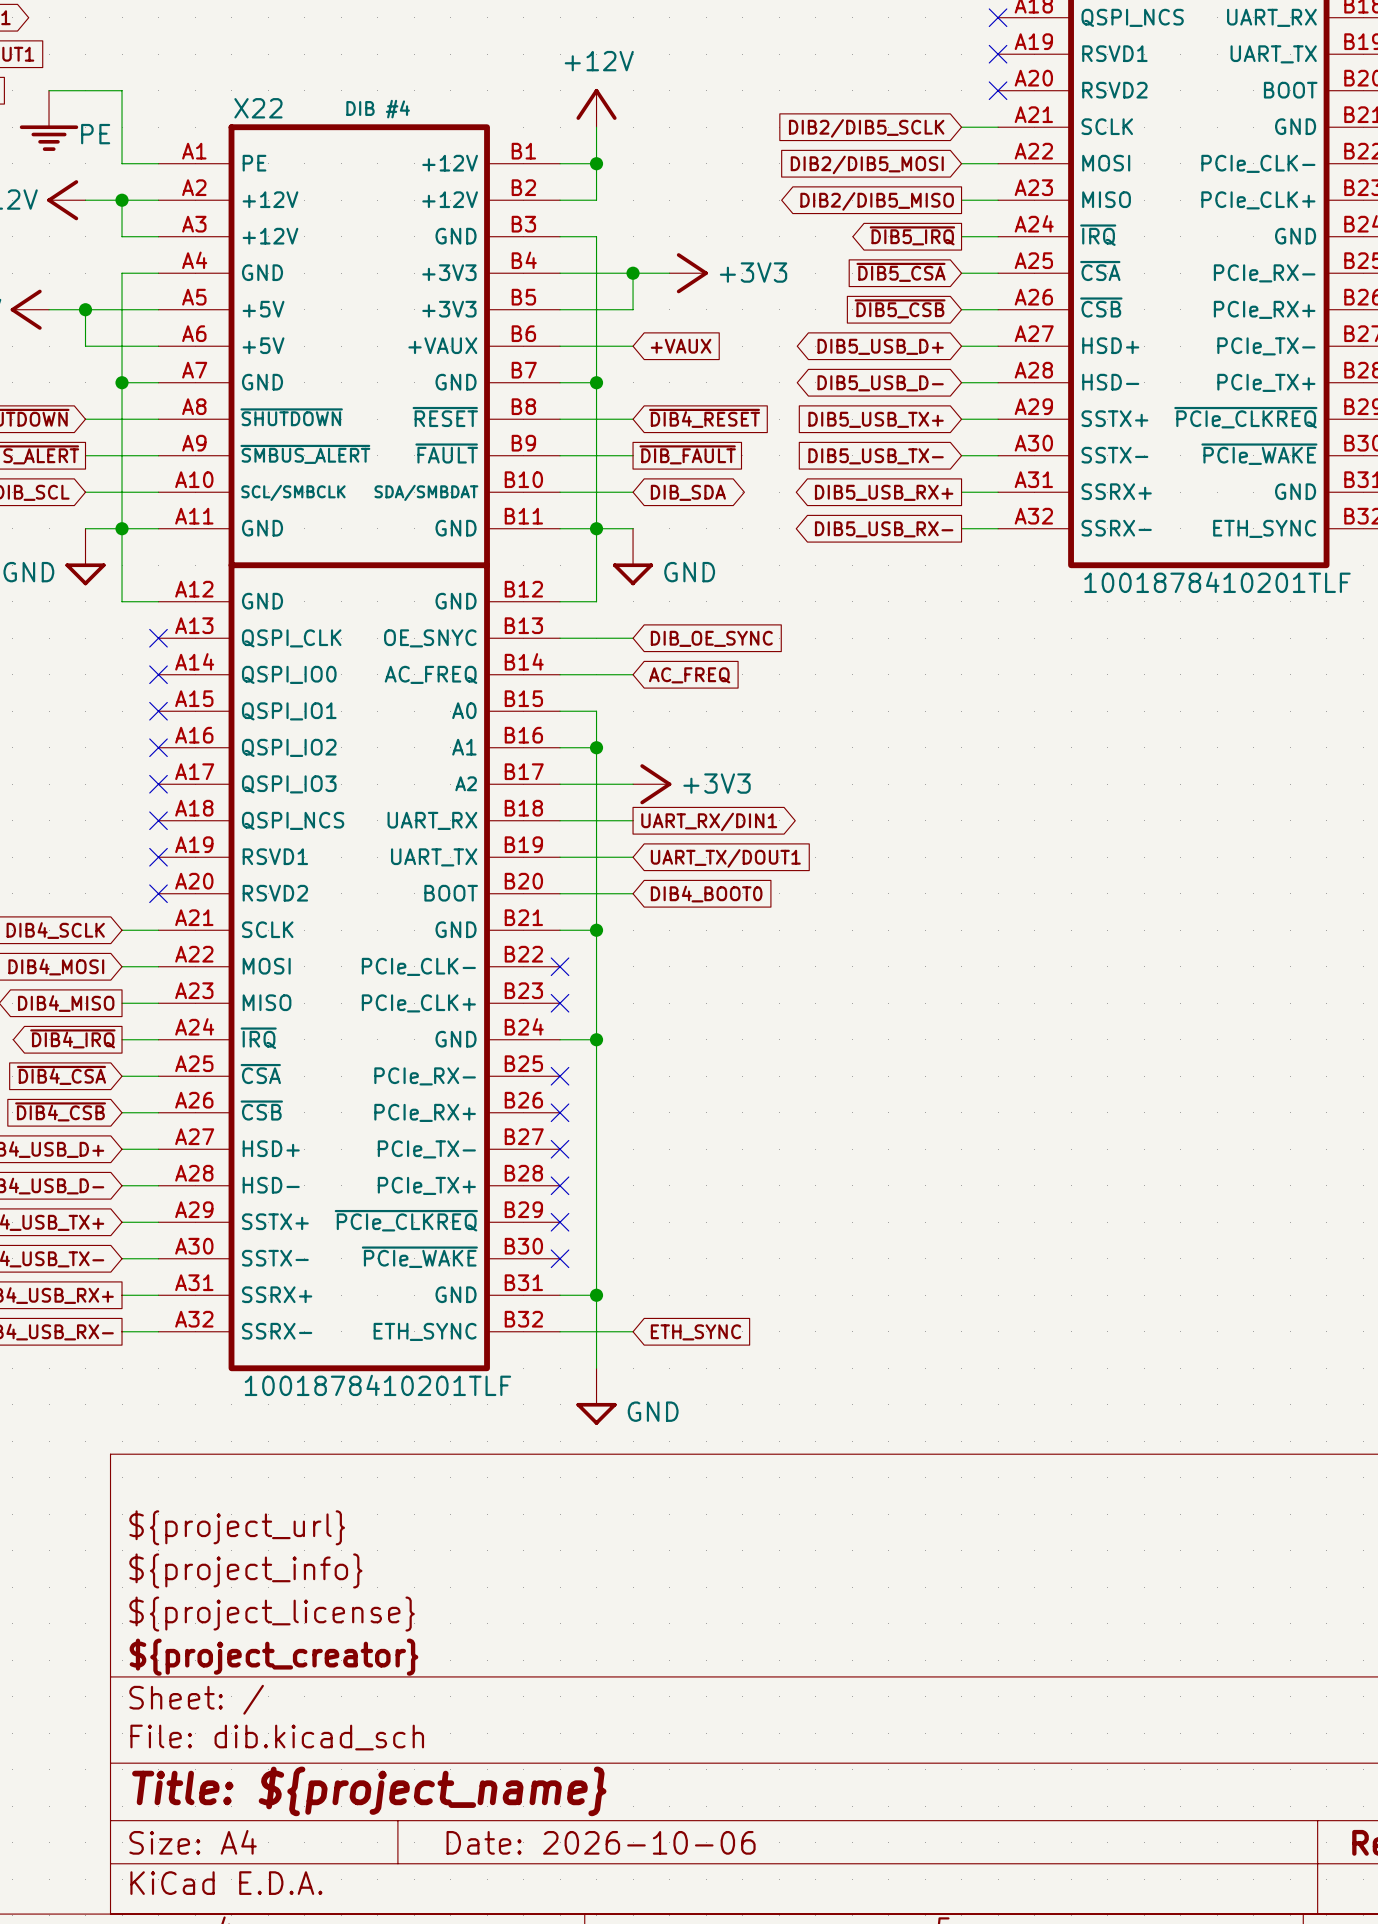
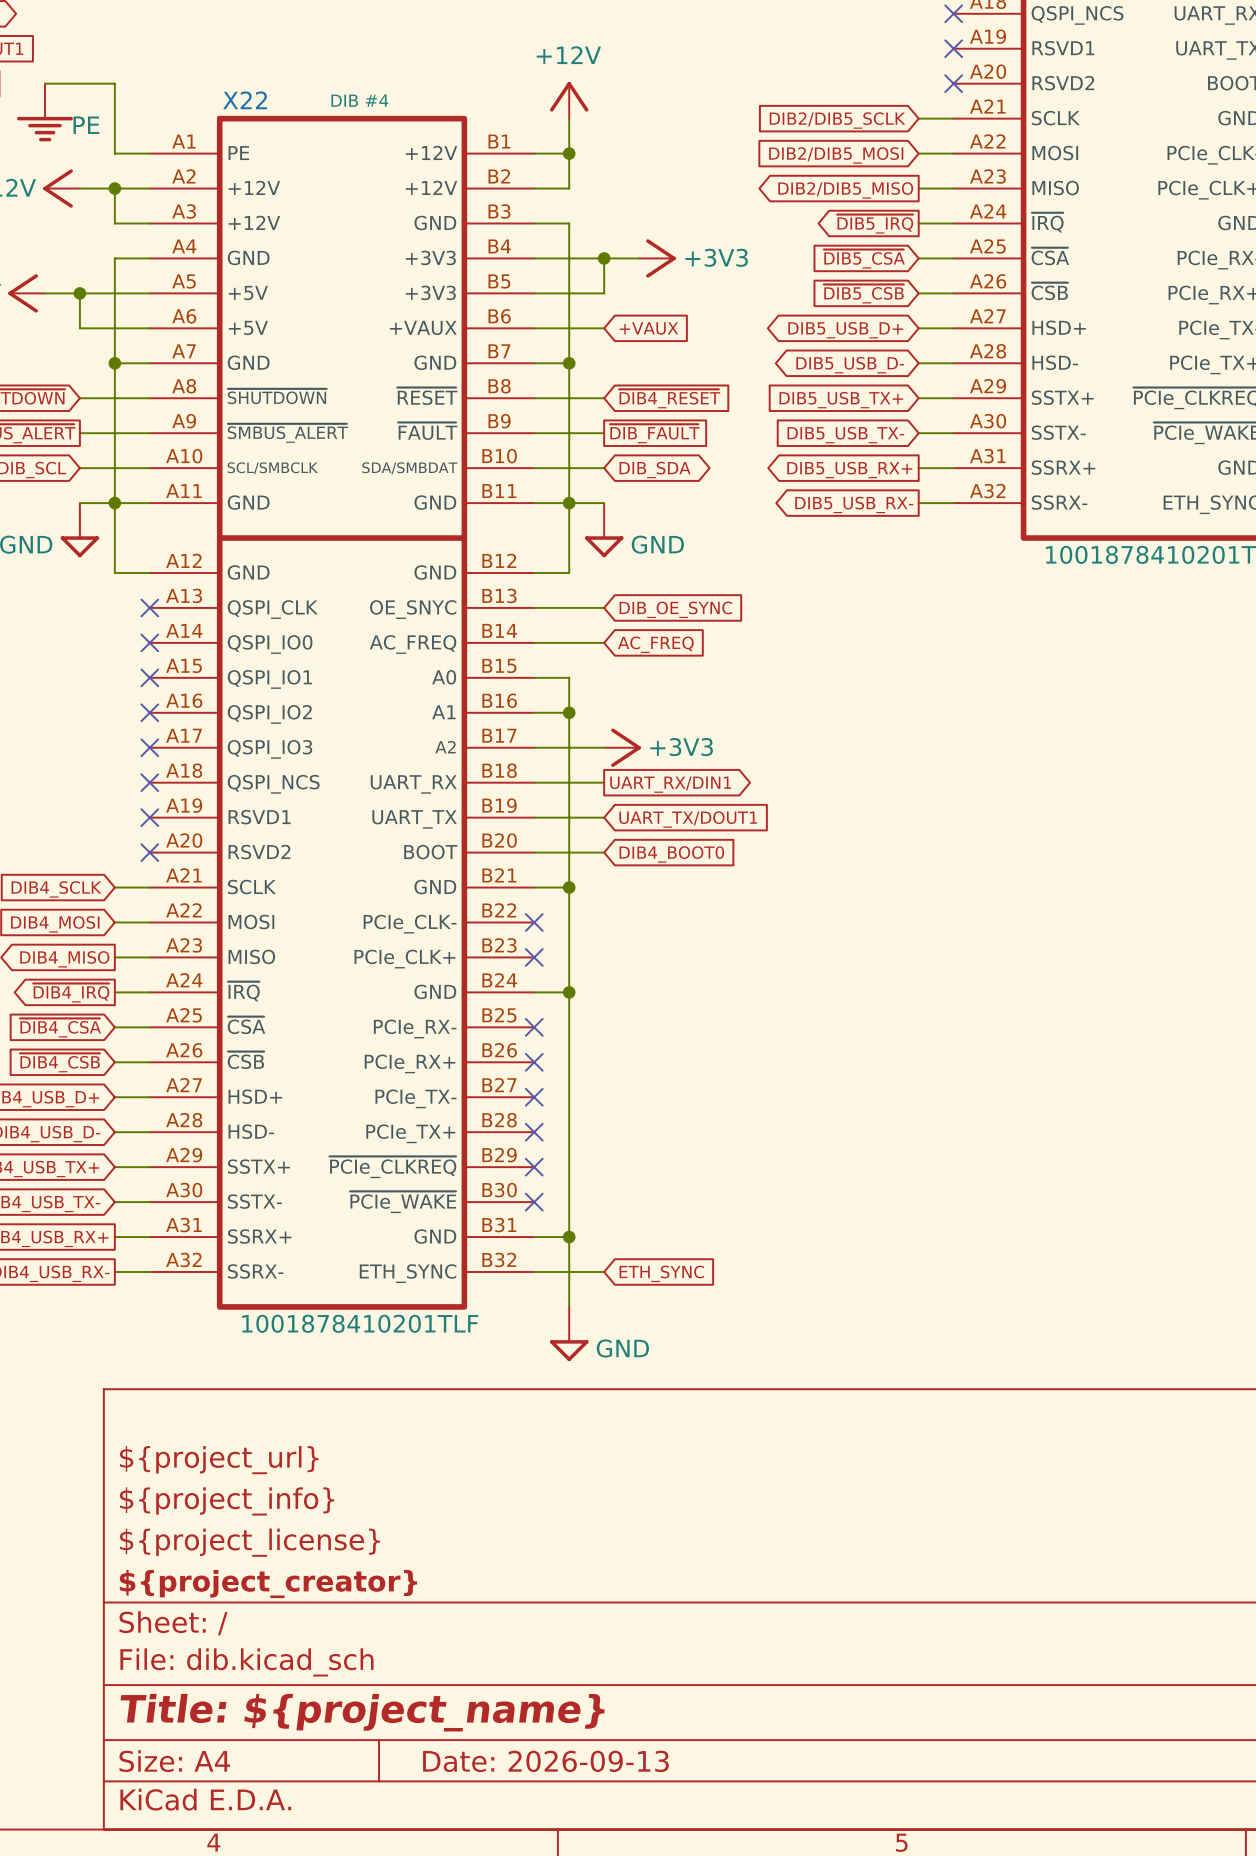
title block: Date: 2026-10-06 (601, 1842) -> Date: 2026-09-13 (545, 1761)

